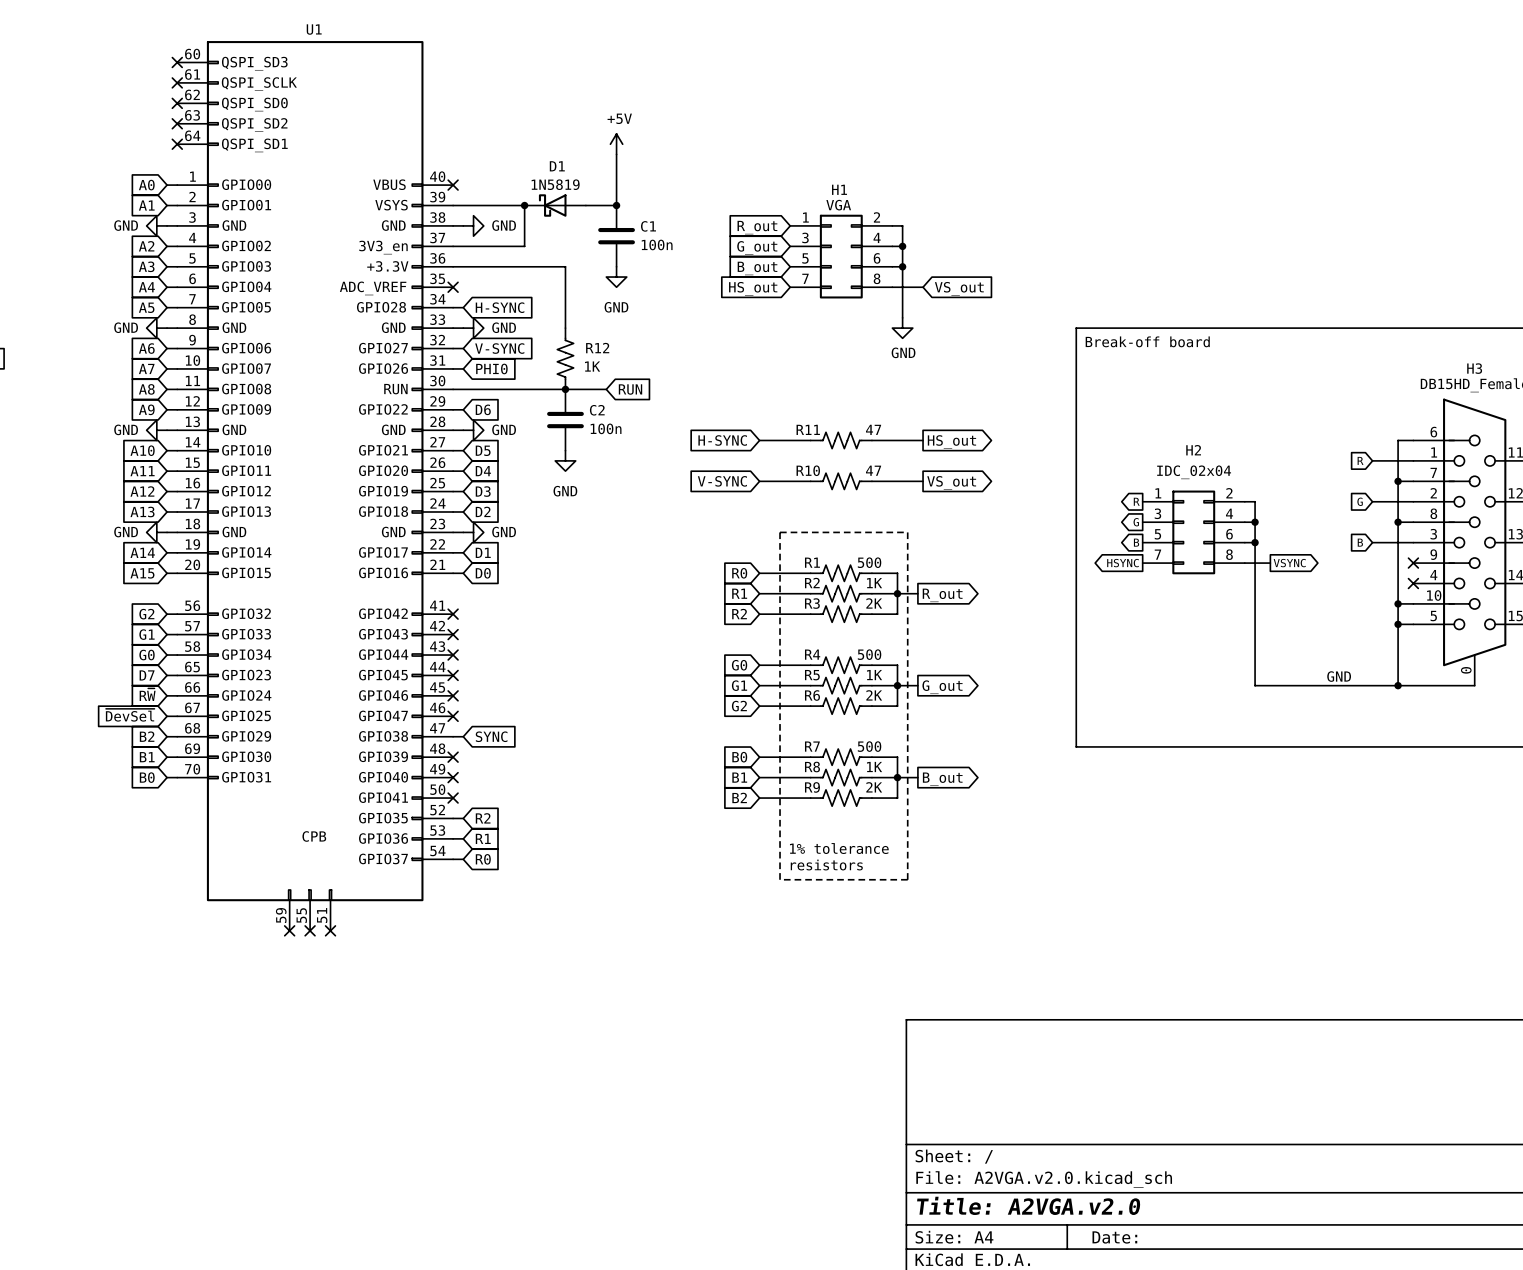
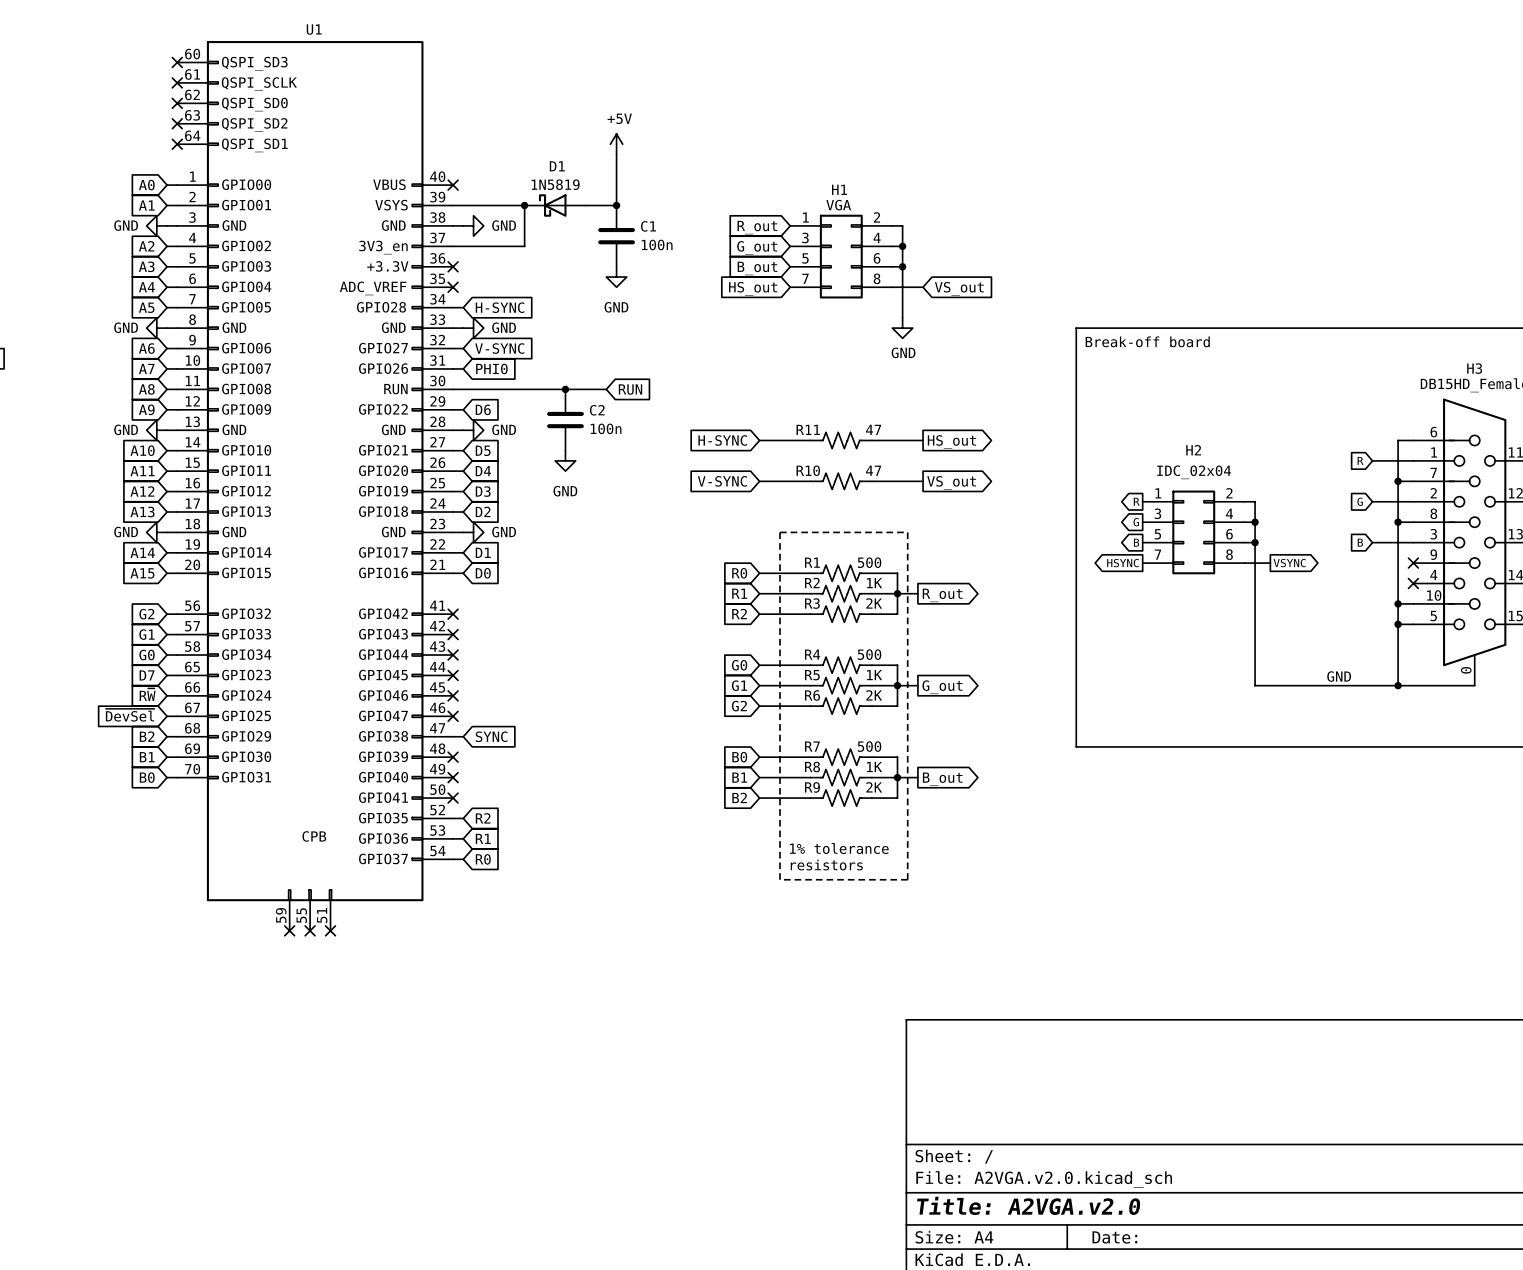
wire: (453, 266) (565, 266) (565, 328) -> none
no-connect mark: none -> (453, 266)
R12: 1K (565, 358) -> none

